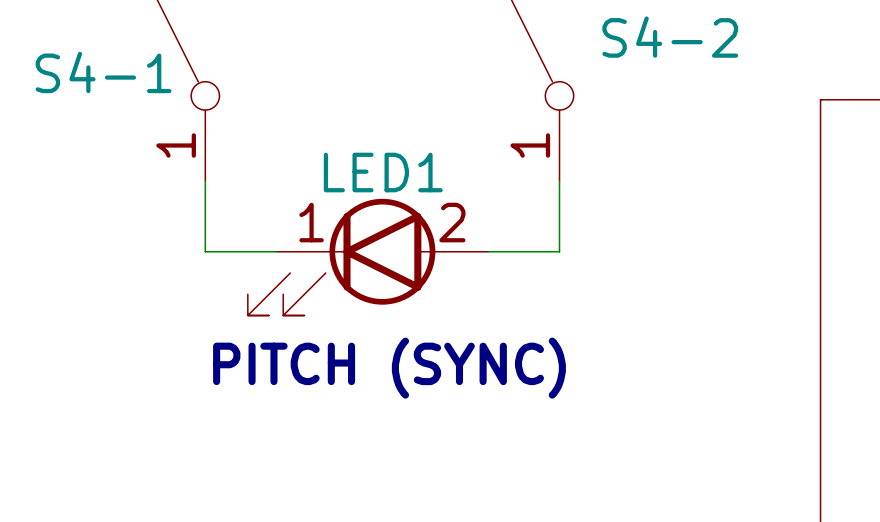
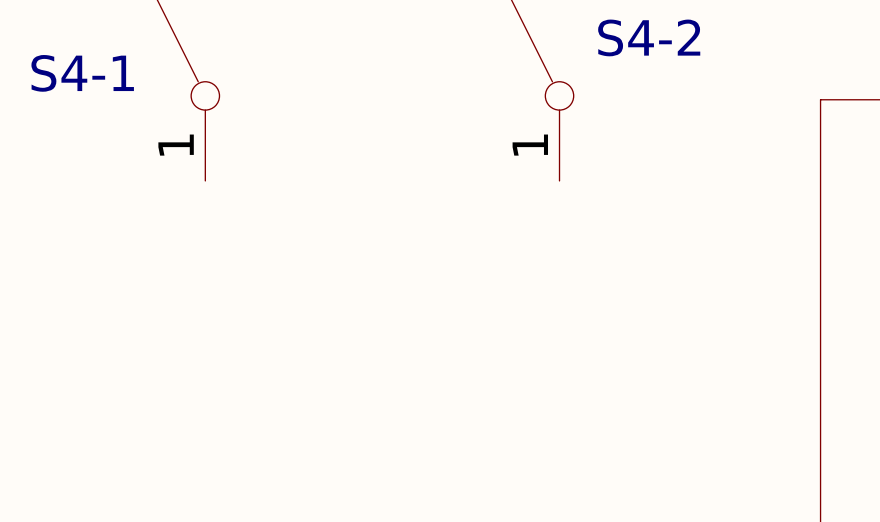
wire: (205, 180) (205, 251) (276, 251) -> none
wire: (559, 180) (559, 251) (488, 251) -> none
LED1: (368, 257) -> none
text: PITCH (SYNC) (389, 368) -> none

